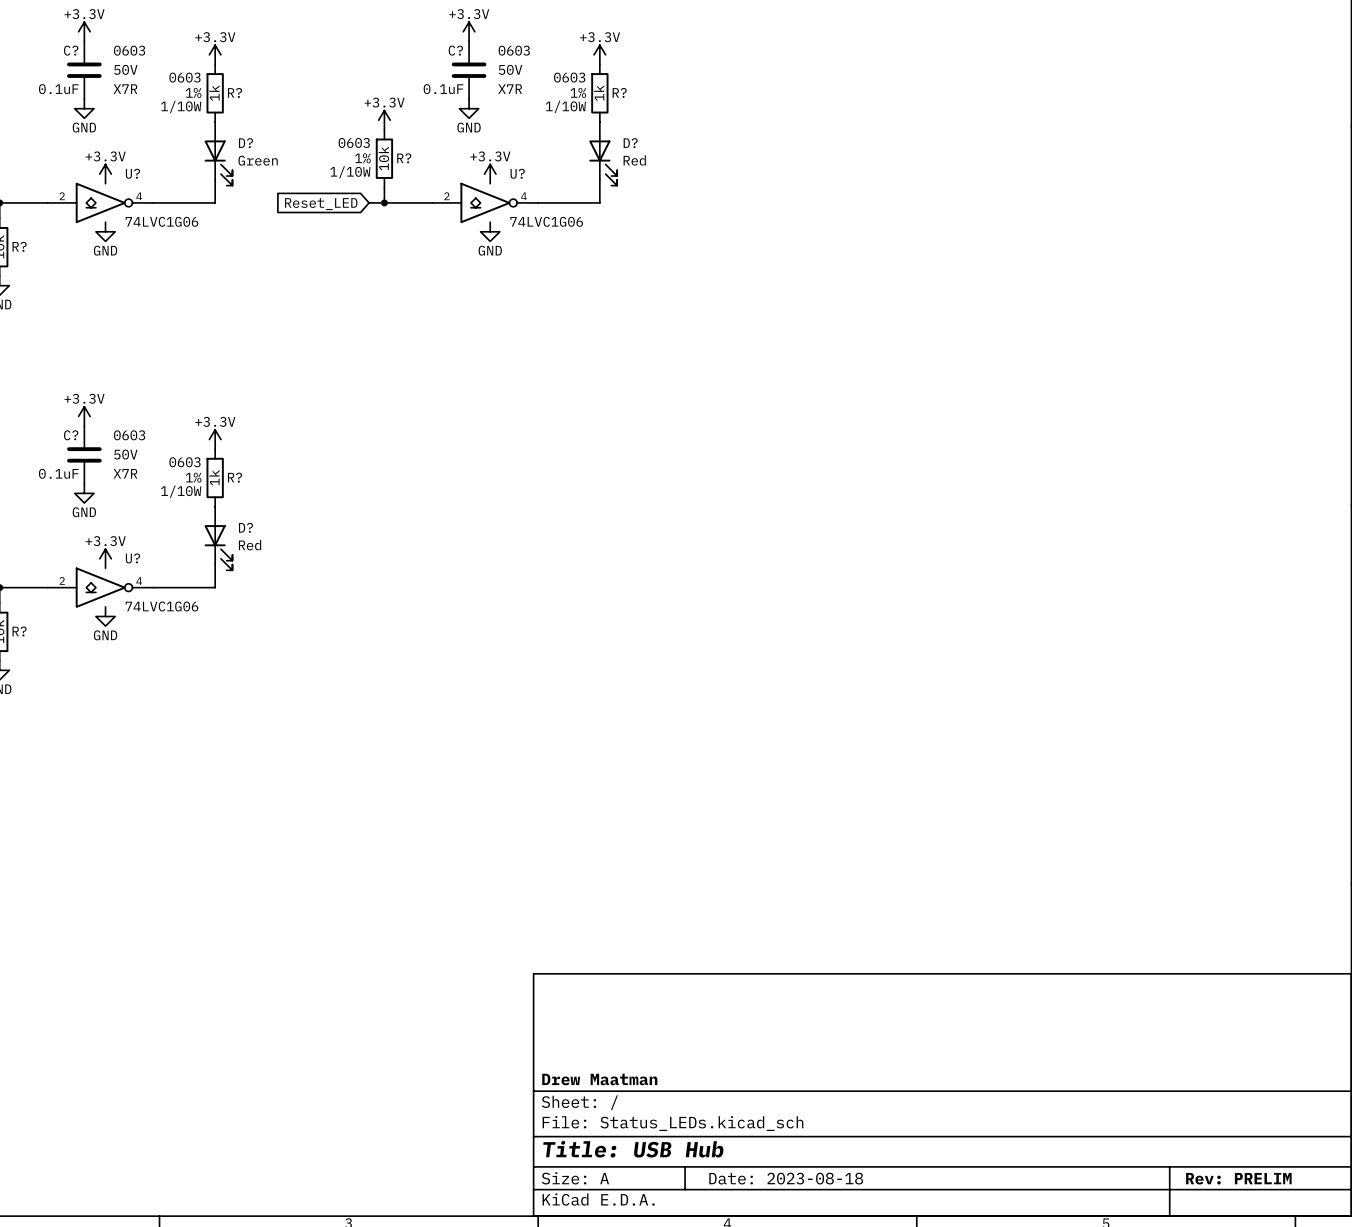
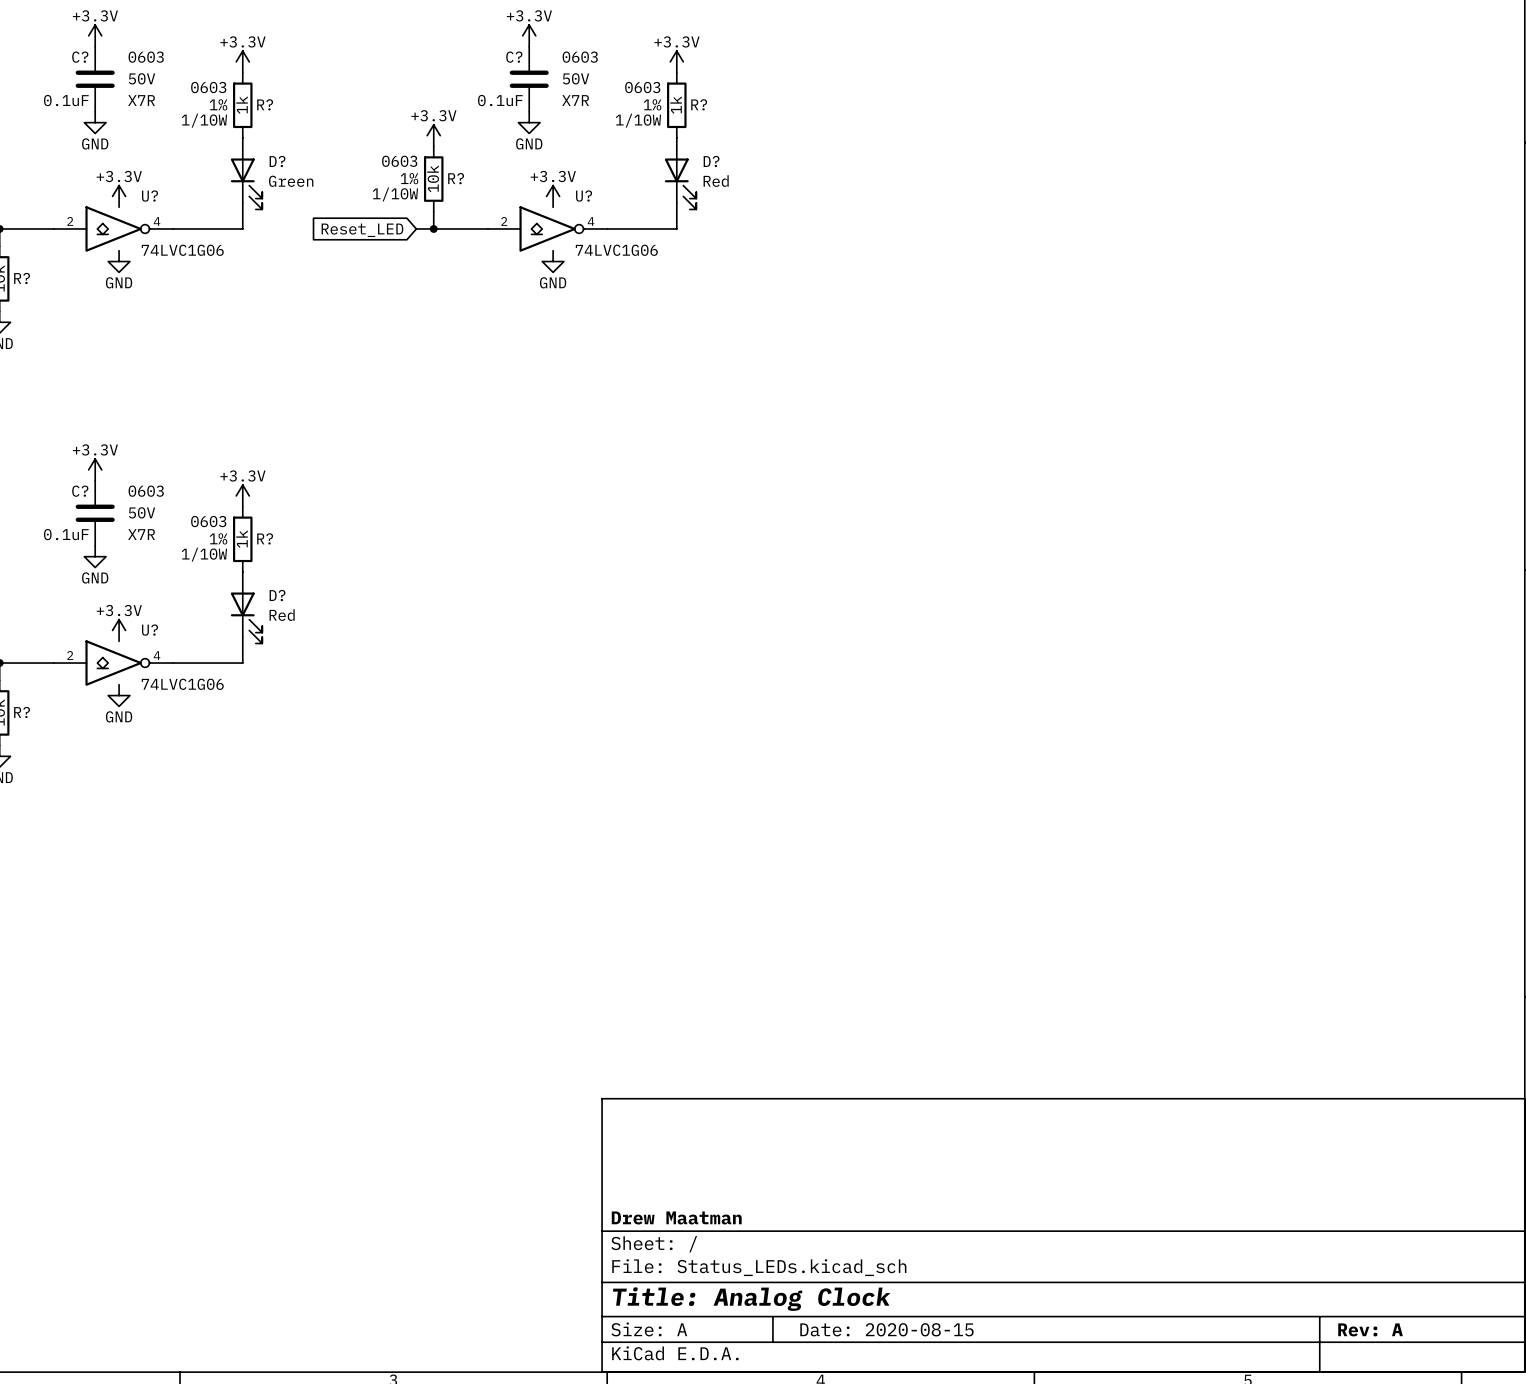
title block: Title: USB Hub (633, 1149) -> Title: Analog Clock (751, 1299)
title block: Date: 2023-08-18 (786, 1178) -> Date: 2020-08-15 (886, 1329)
title block: Rev: PRELIM (1238, 1178) -> Rev: A (1370, 1329)

